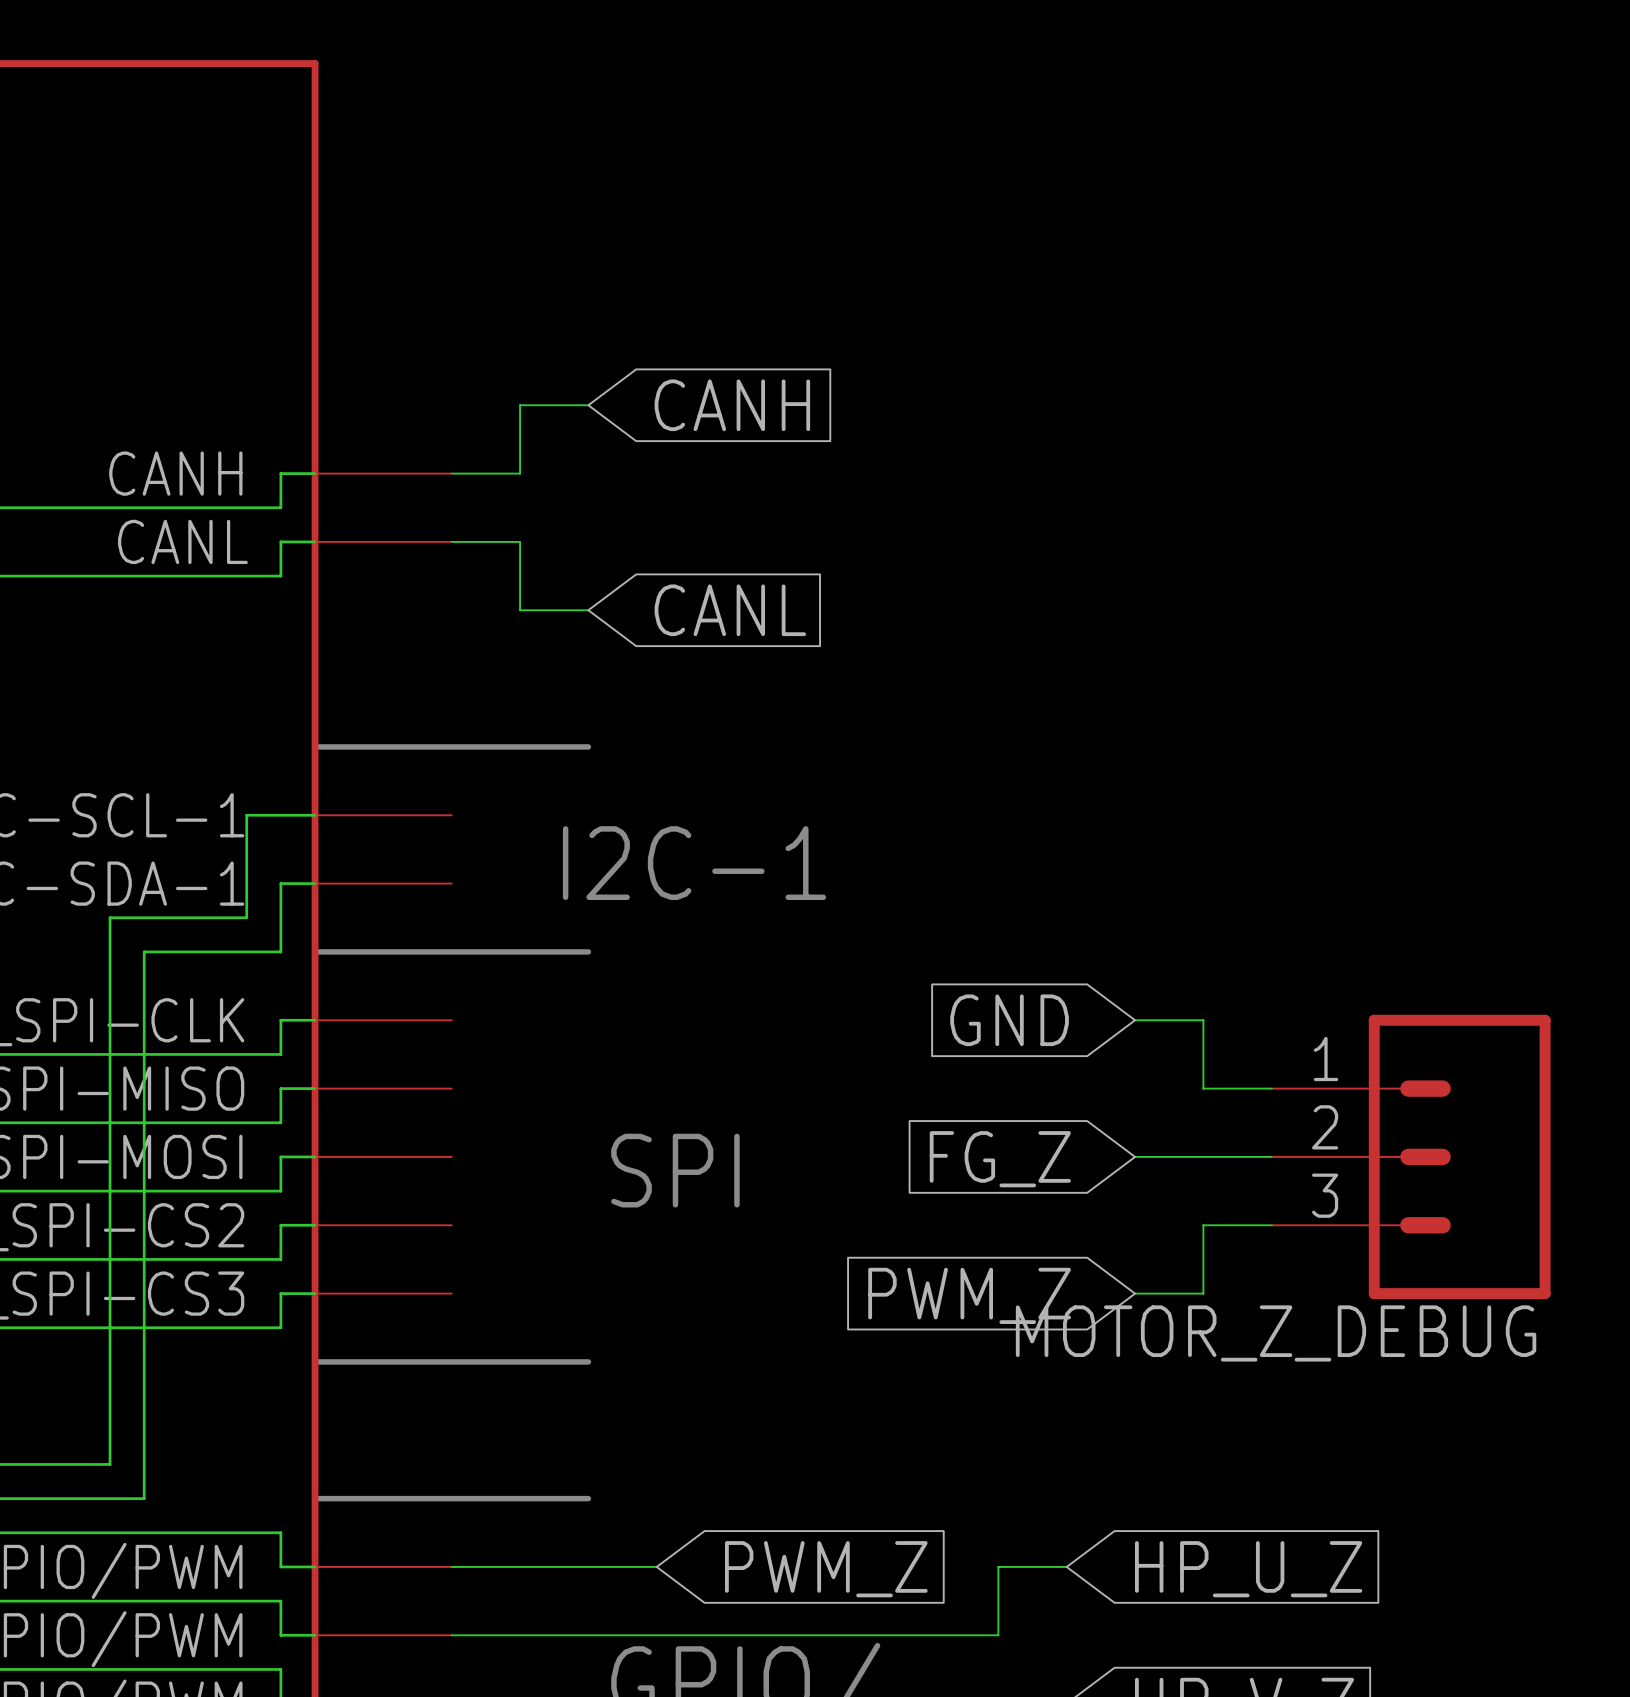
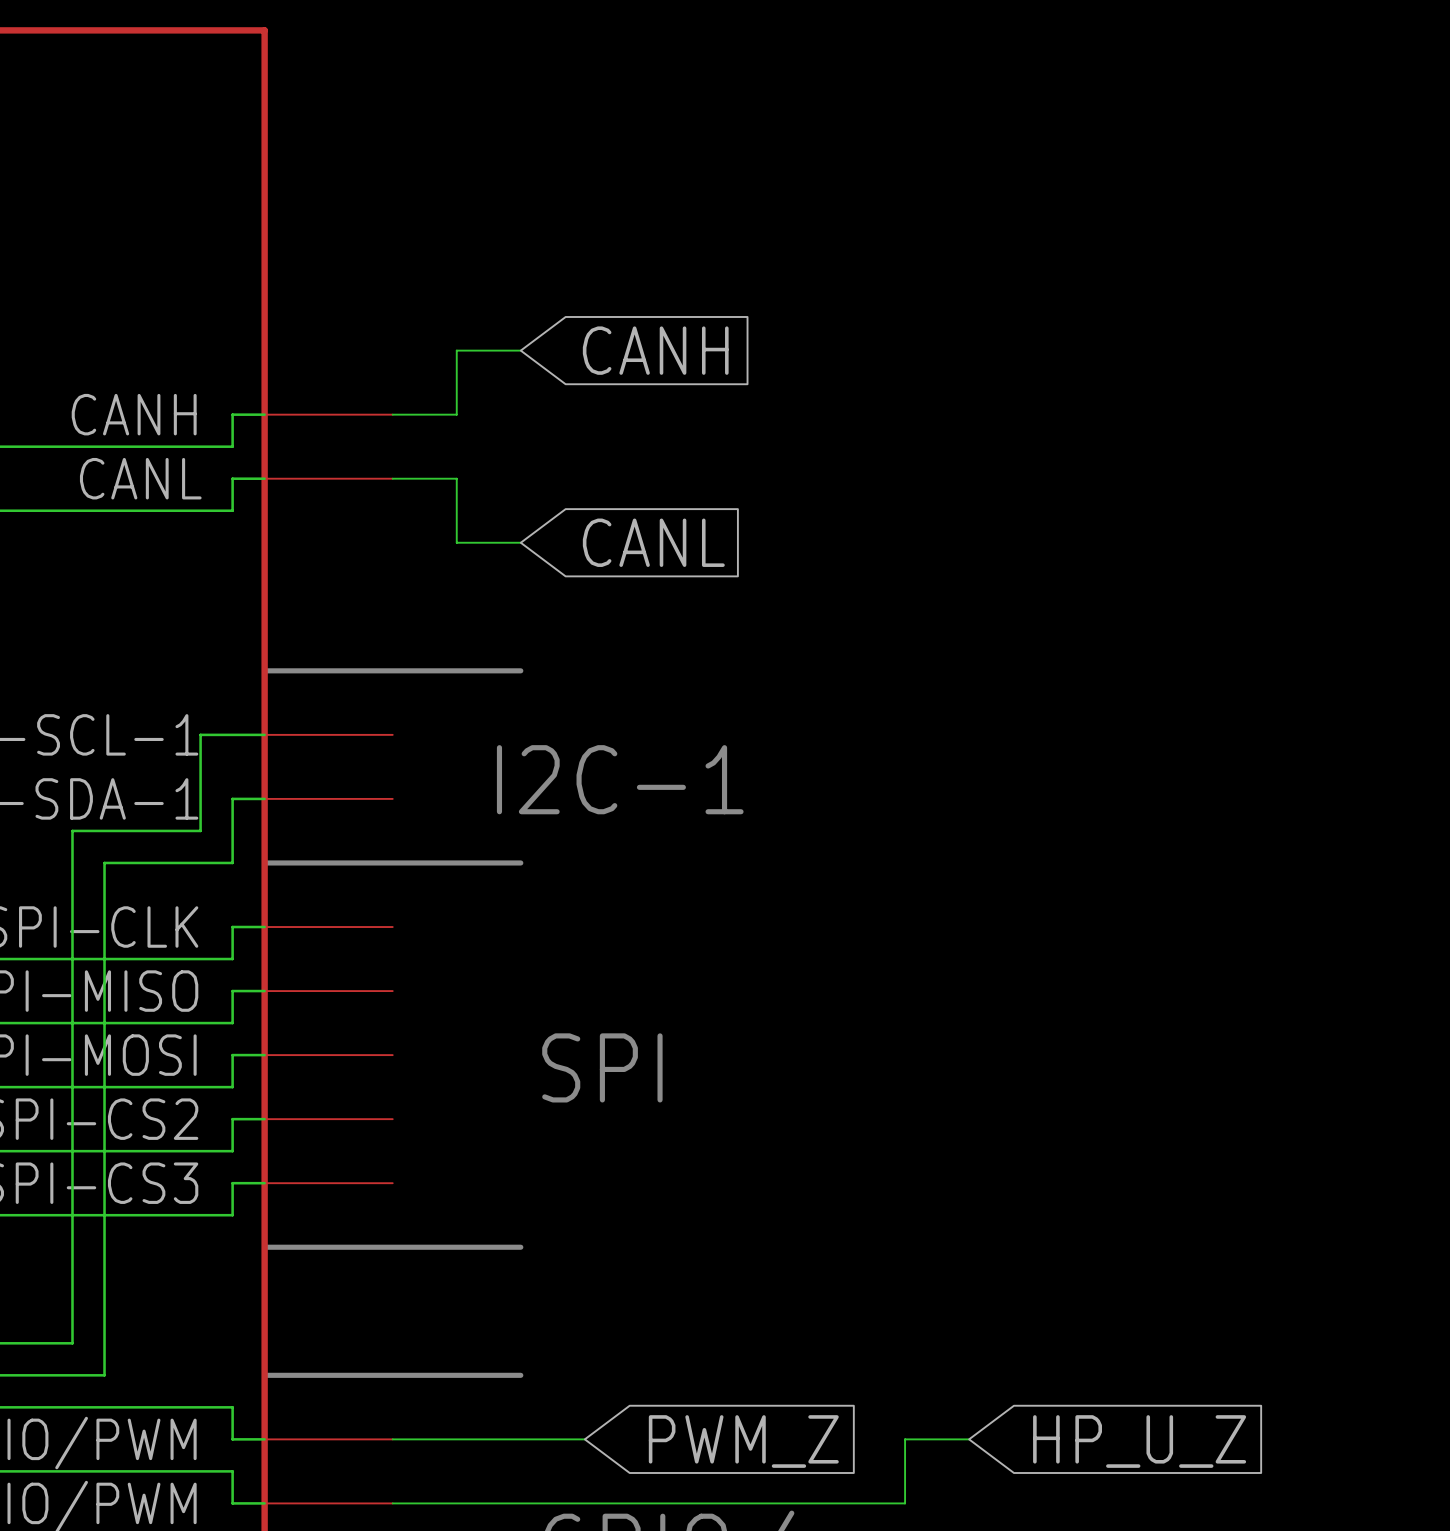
global label: GND (1009, 1020) -> none
wire: (1135, 1020) (1203, 1020) (1203, 1088) (1271, 1088) -> none
wire: (1135, 1156) (1271, 1156) -> none
MOTOR_Z_DEBUG: (1411, 1156) -> none
global label: FG_Z (1000, 1159) -> none
wire: (1271, 1225) (1203, 1225) (1203, 1293) (1135, 1293) -> none
global label: PWM_Z (969, 1295) -> none

